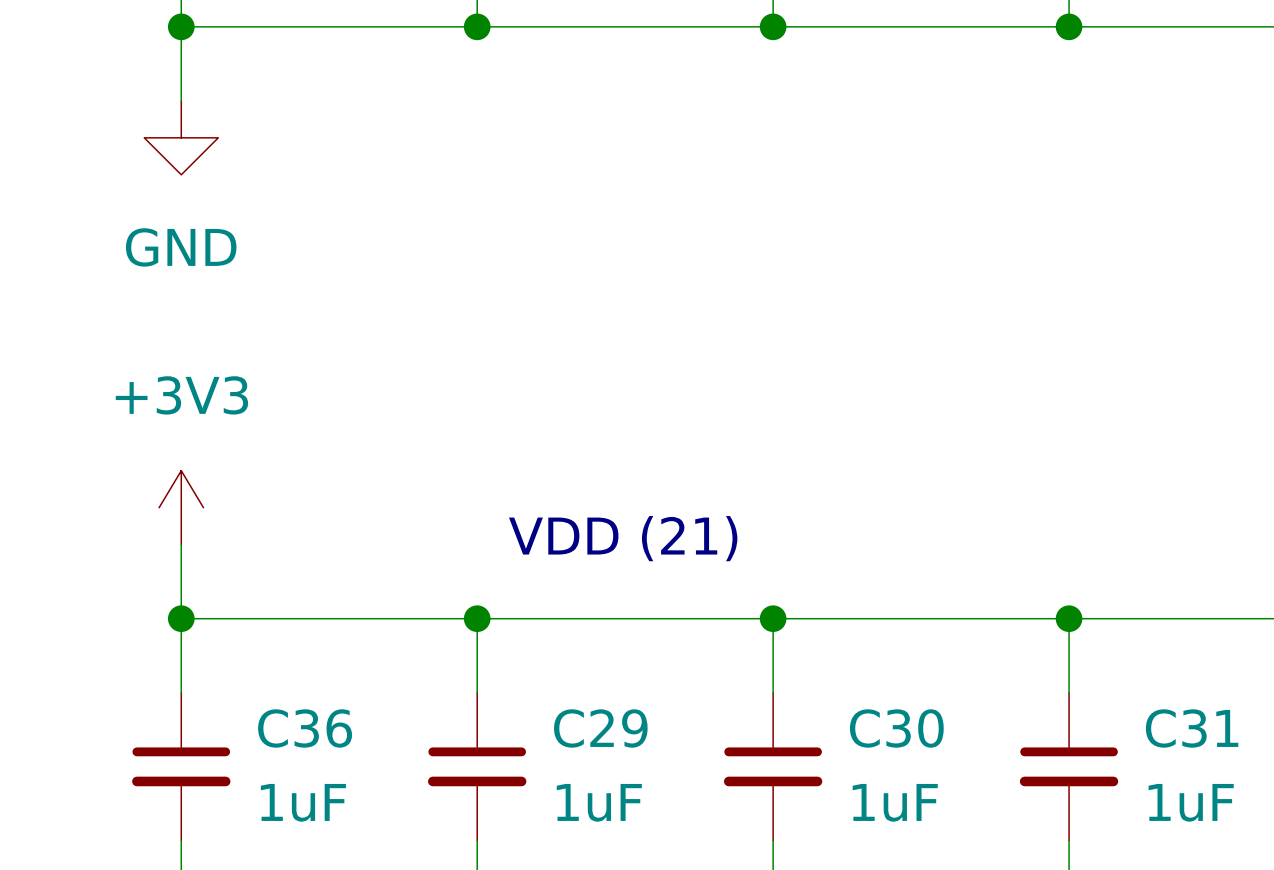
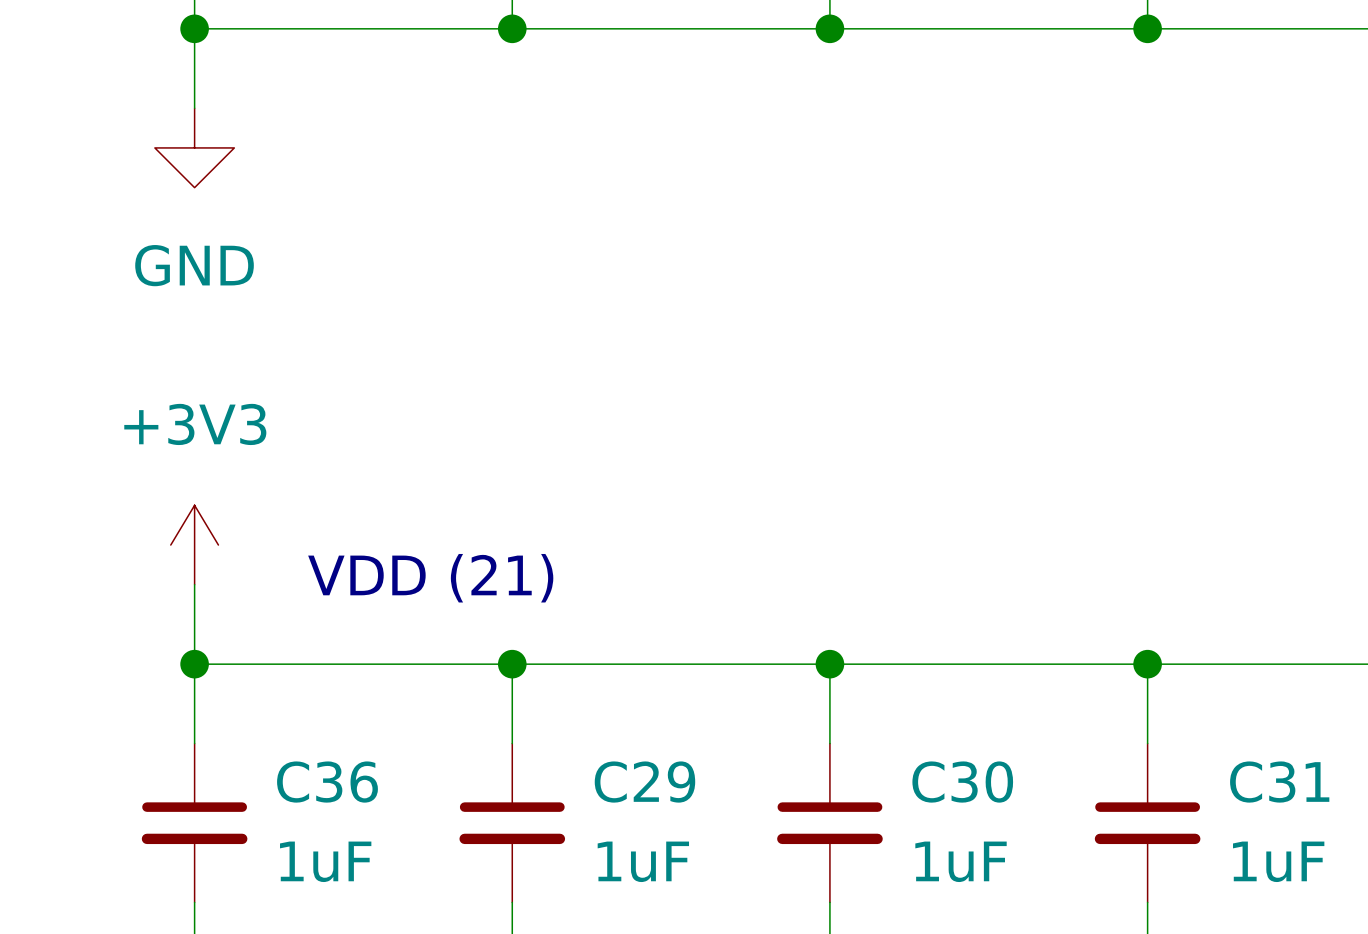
text position: VDD (21) (623, 538) -> VDD (21) (430, 578)

